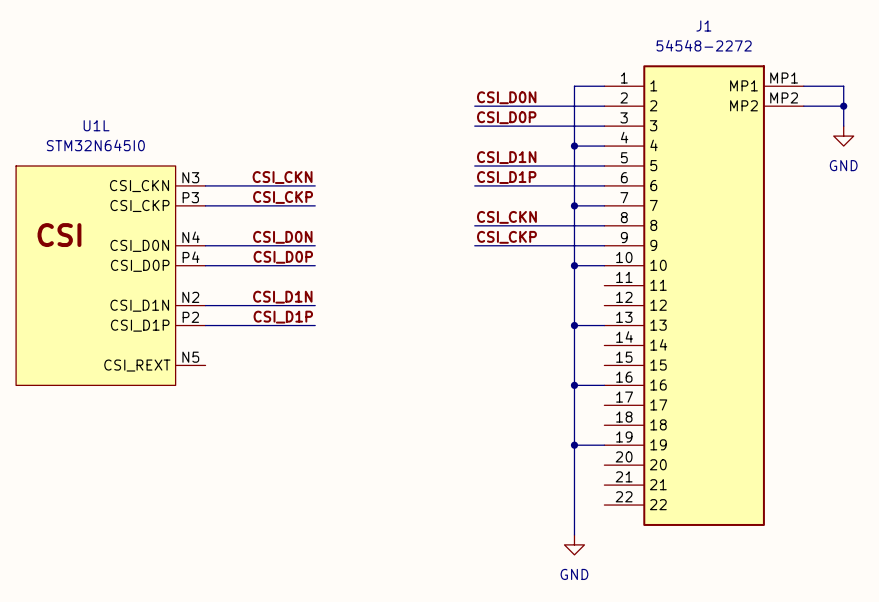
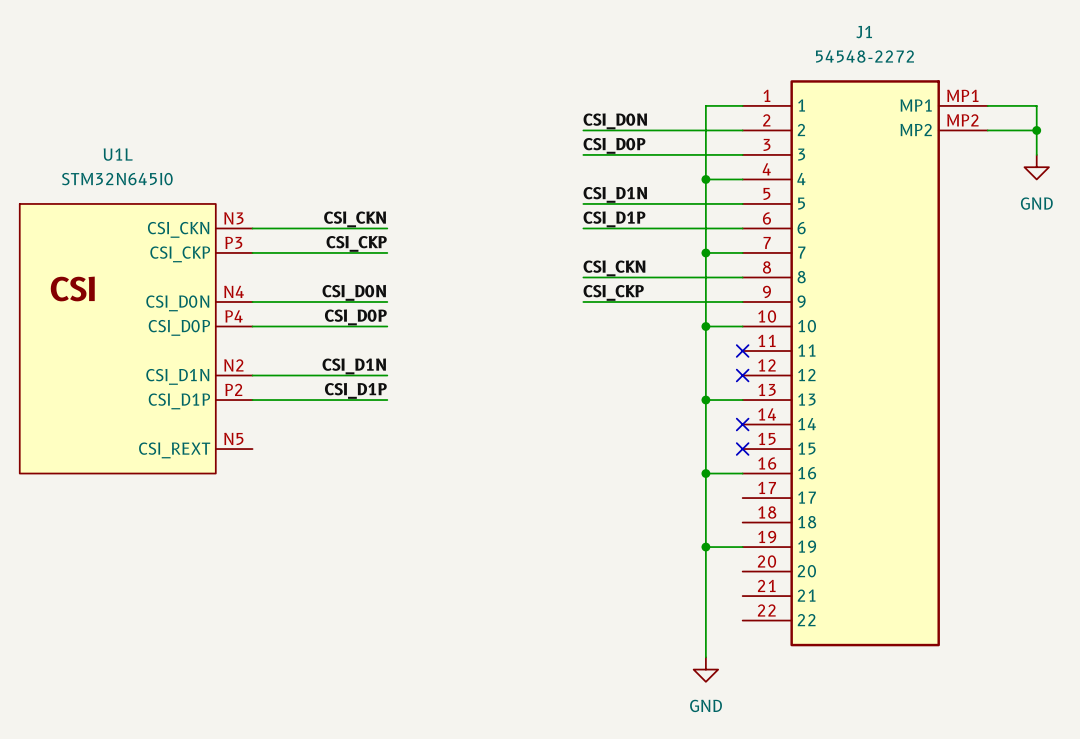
no-connect mark: none -> (742, 351)
no-connect mark: none -> (742, 375)
no-connect mark: none -> (742, 424)
no-connect mark: none -> (742, 449)

